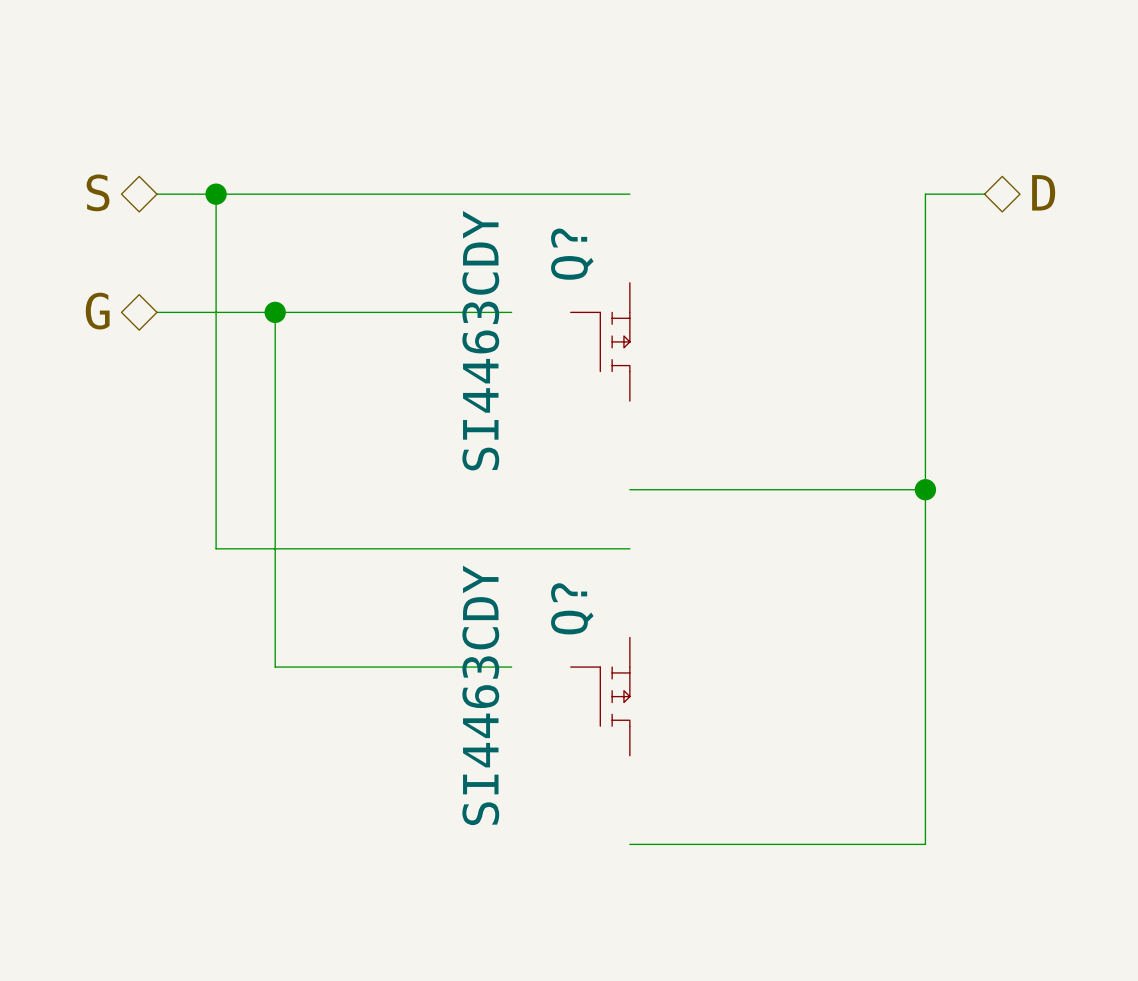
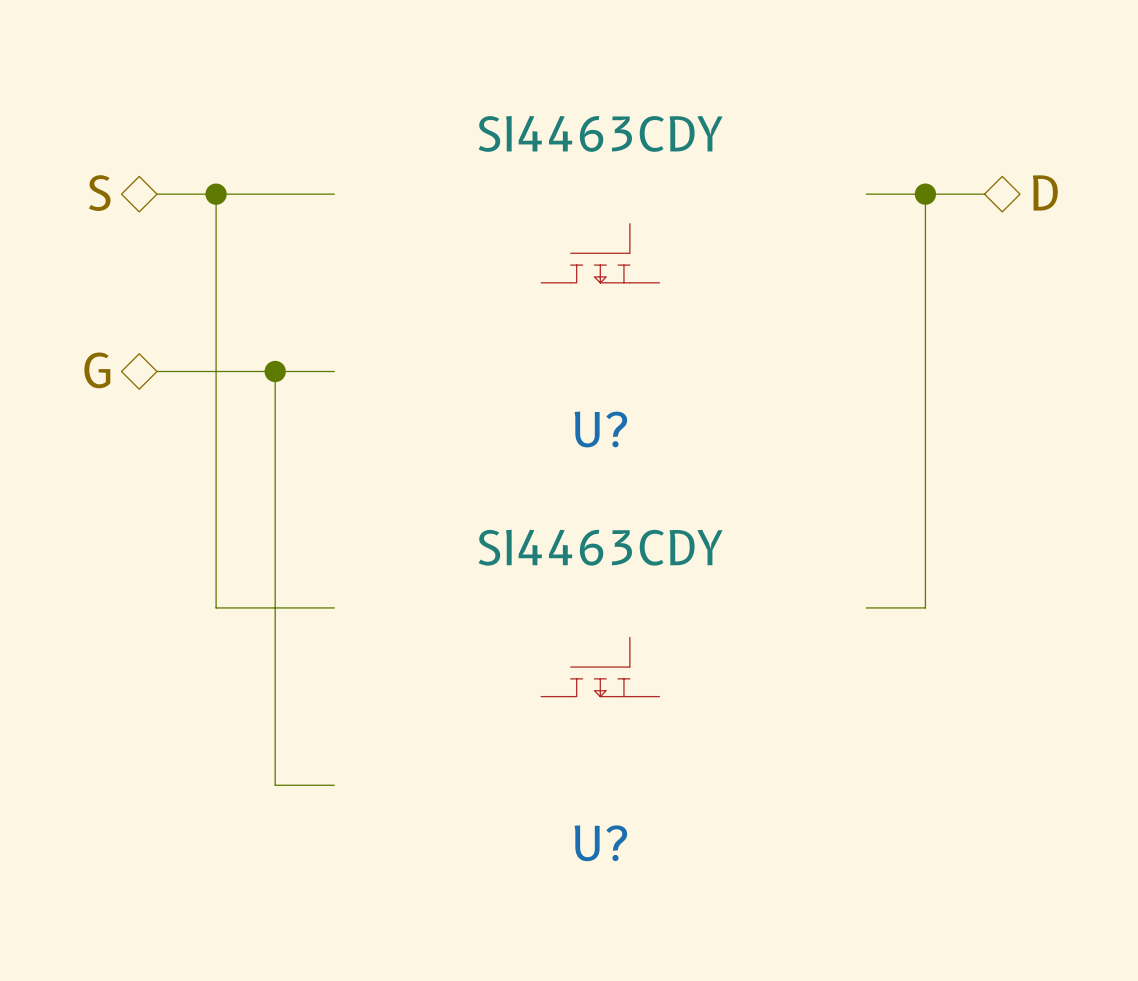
wire: (334, 194) (629, 194) -> none
wire: none -> (866, 194) (925, 194)
junction: none -> (925, 194)
U?: none -> SI4463CDY (600, 253)
hierarchical label position: G (97, 311) -> G (97, 370)
wire: (156, 312) (511, 312) -> none
wire: (275, 312) (275, 371) -> none
junction position: (275, 312) -> (275, 371)
Q?: SI4463CDY (600, 341) -> none
wire: none -> (156, 371) (334, 371)
wire: (629, 489) (925, 489) -> none
junction: (925, 489) -> none
wire: (216, 548) (629, 548) -> (216, 548) (216, 607) (334, 607)
wire: (925, 607) (925, 844) (629, 844) -> (925, 607) (866, 607)
wire: (275, 667) (511, 667) -> (275, 667) (275, 785) (334, 785)
U?: none -> SI4463CDY (600, 667)
Q?: SI4463CDY (600, 696) -> none

